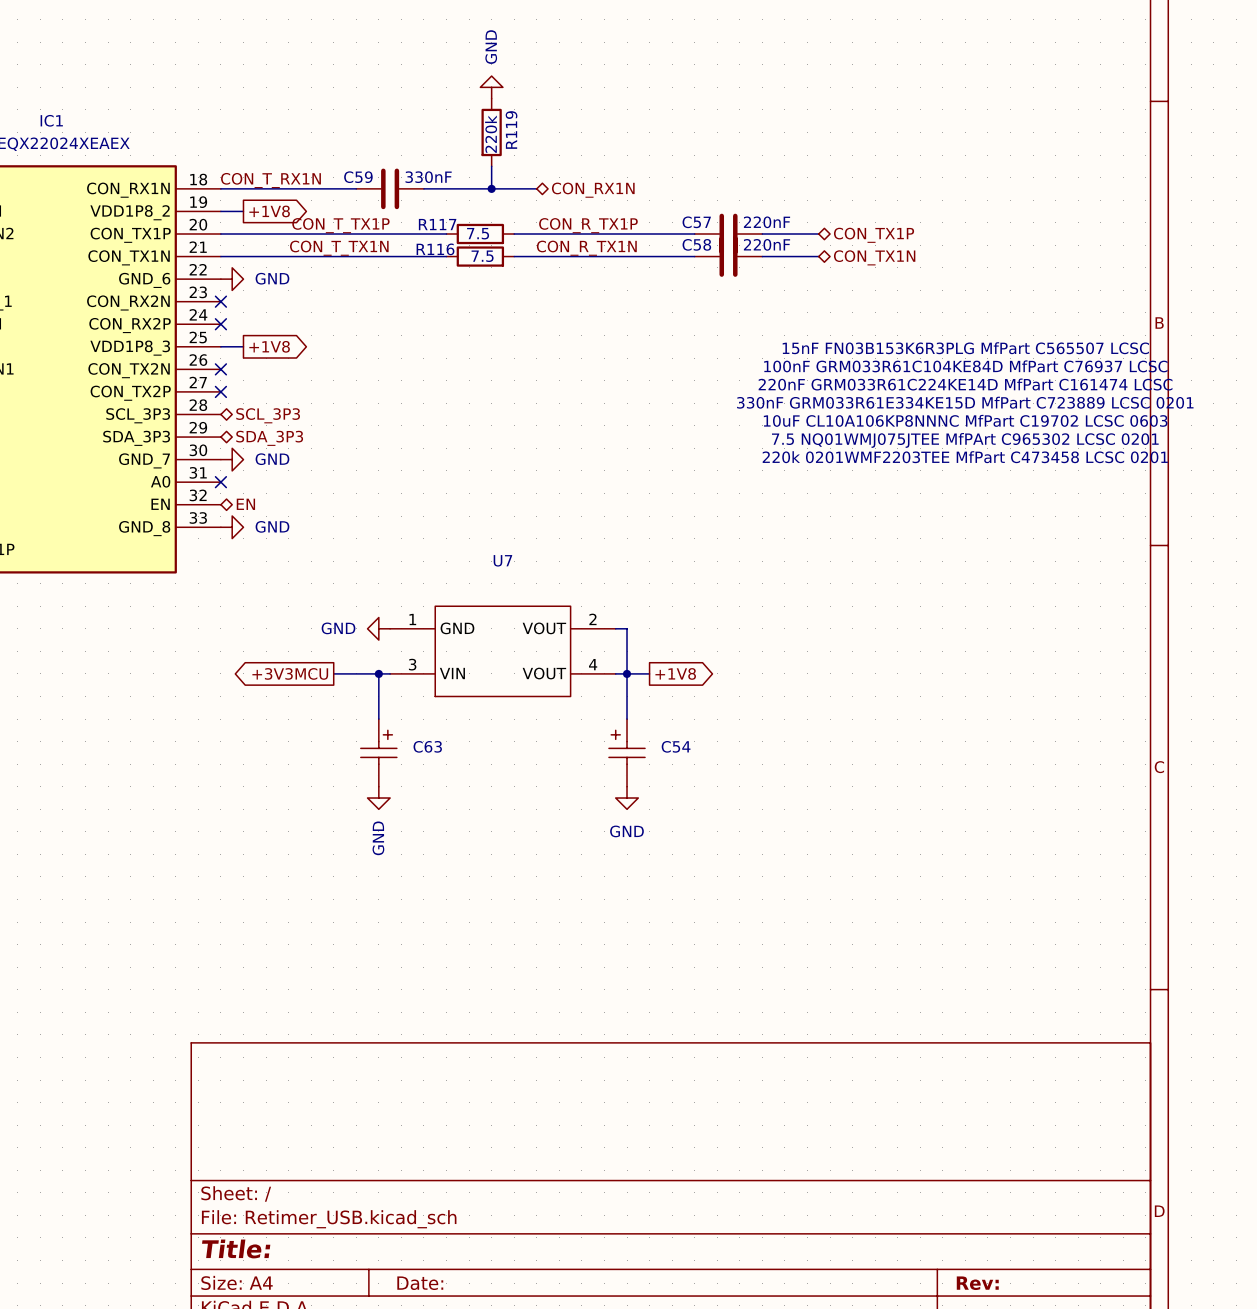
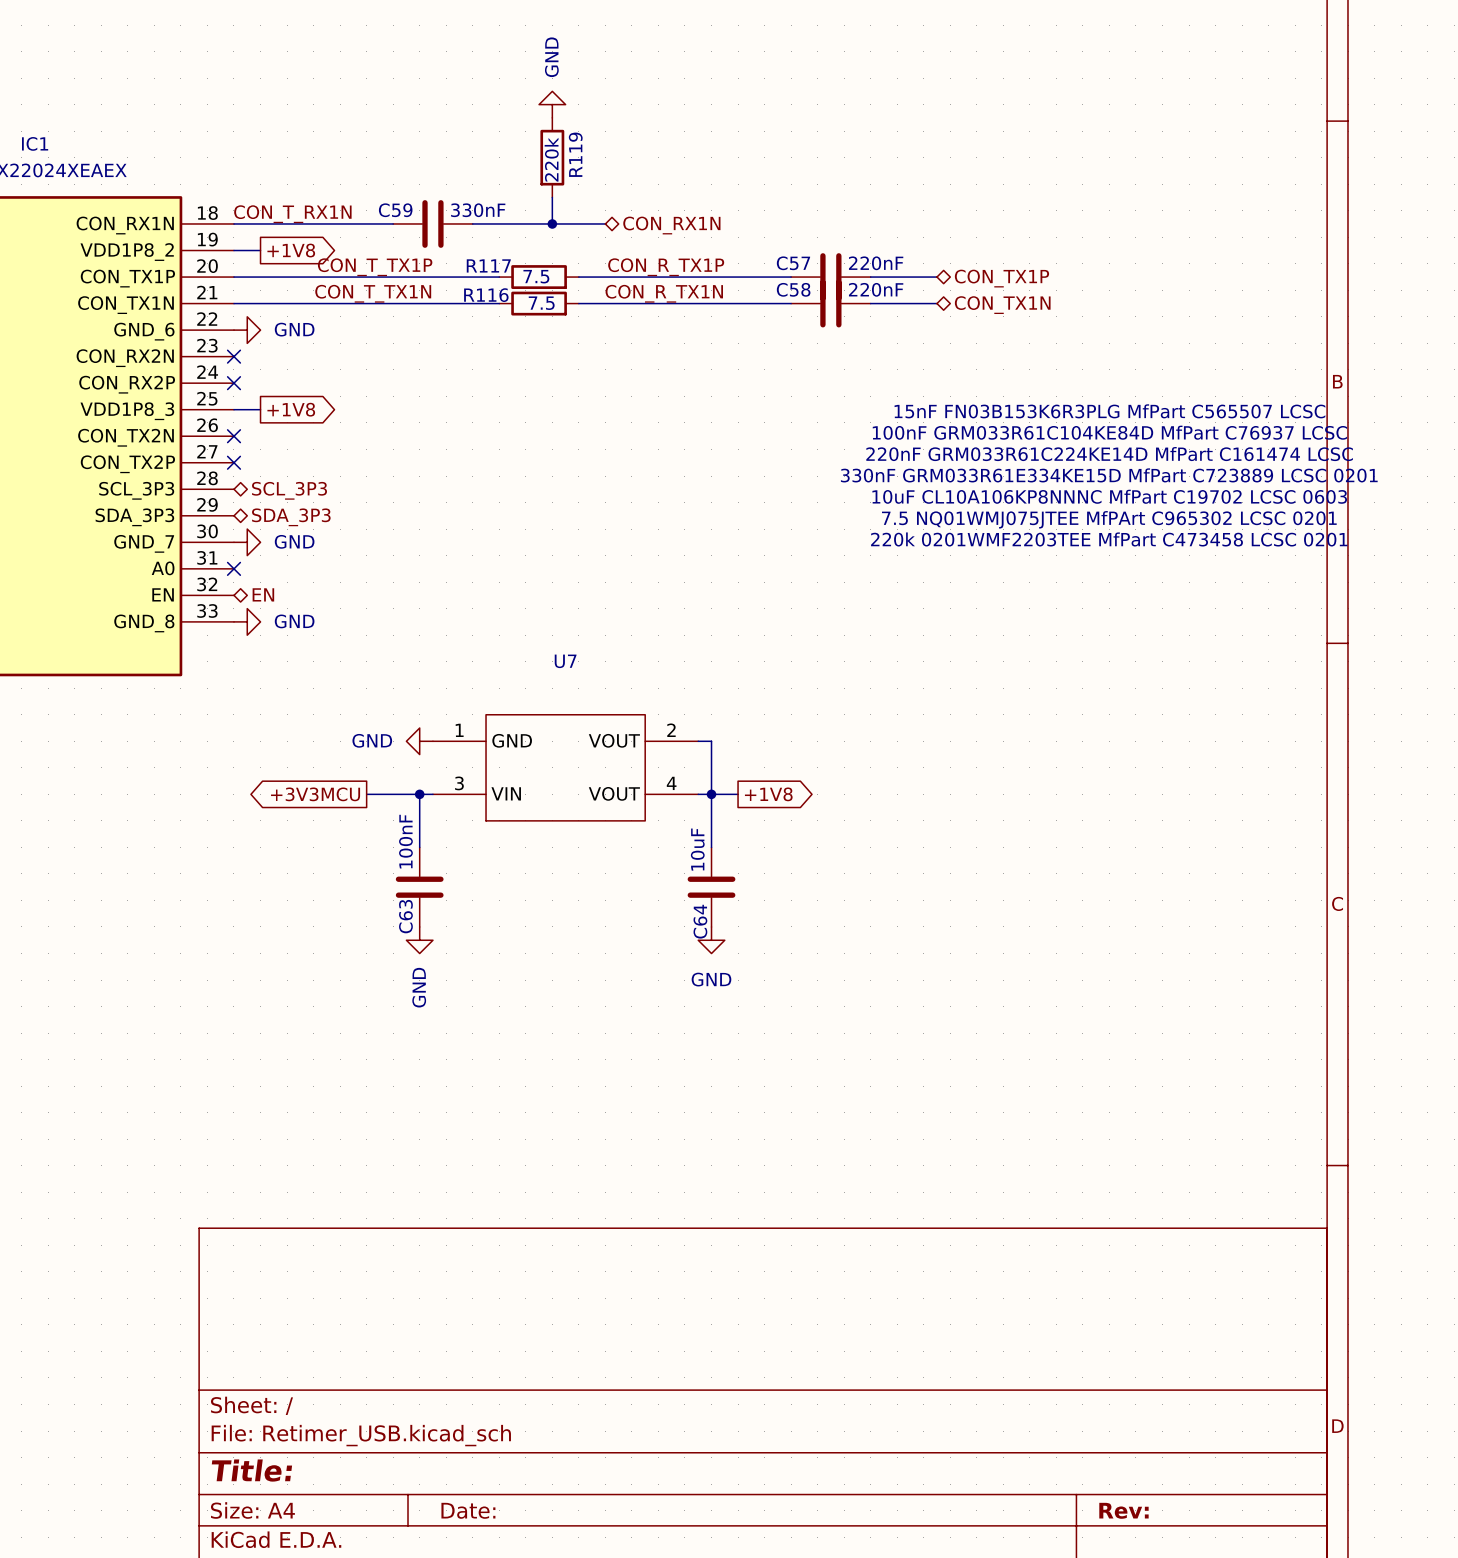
C63 value: none -> 100nF (405, 841)
C63 symbol: [360, 719, 397, 787] -> [395, 847, 444, 927]
C63 name position: C63 (427, 746) -> C63 (405, 916)
C54: (627, 752) -> none
C64: none -> 10uF (711, 887)

